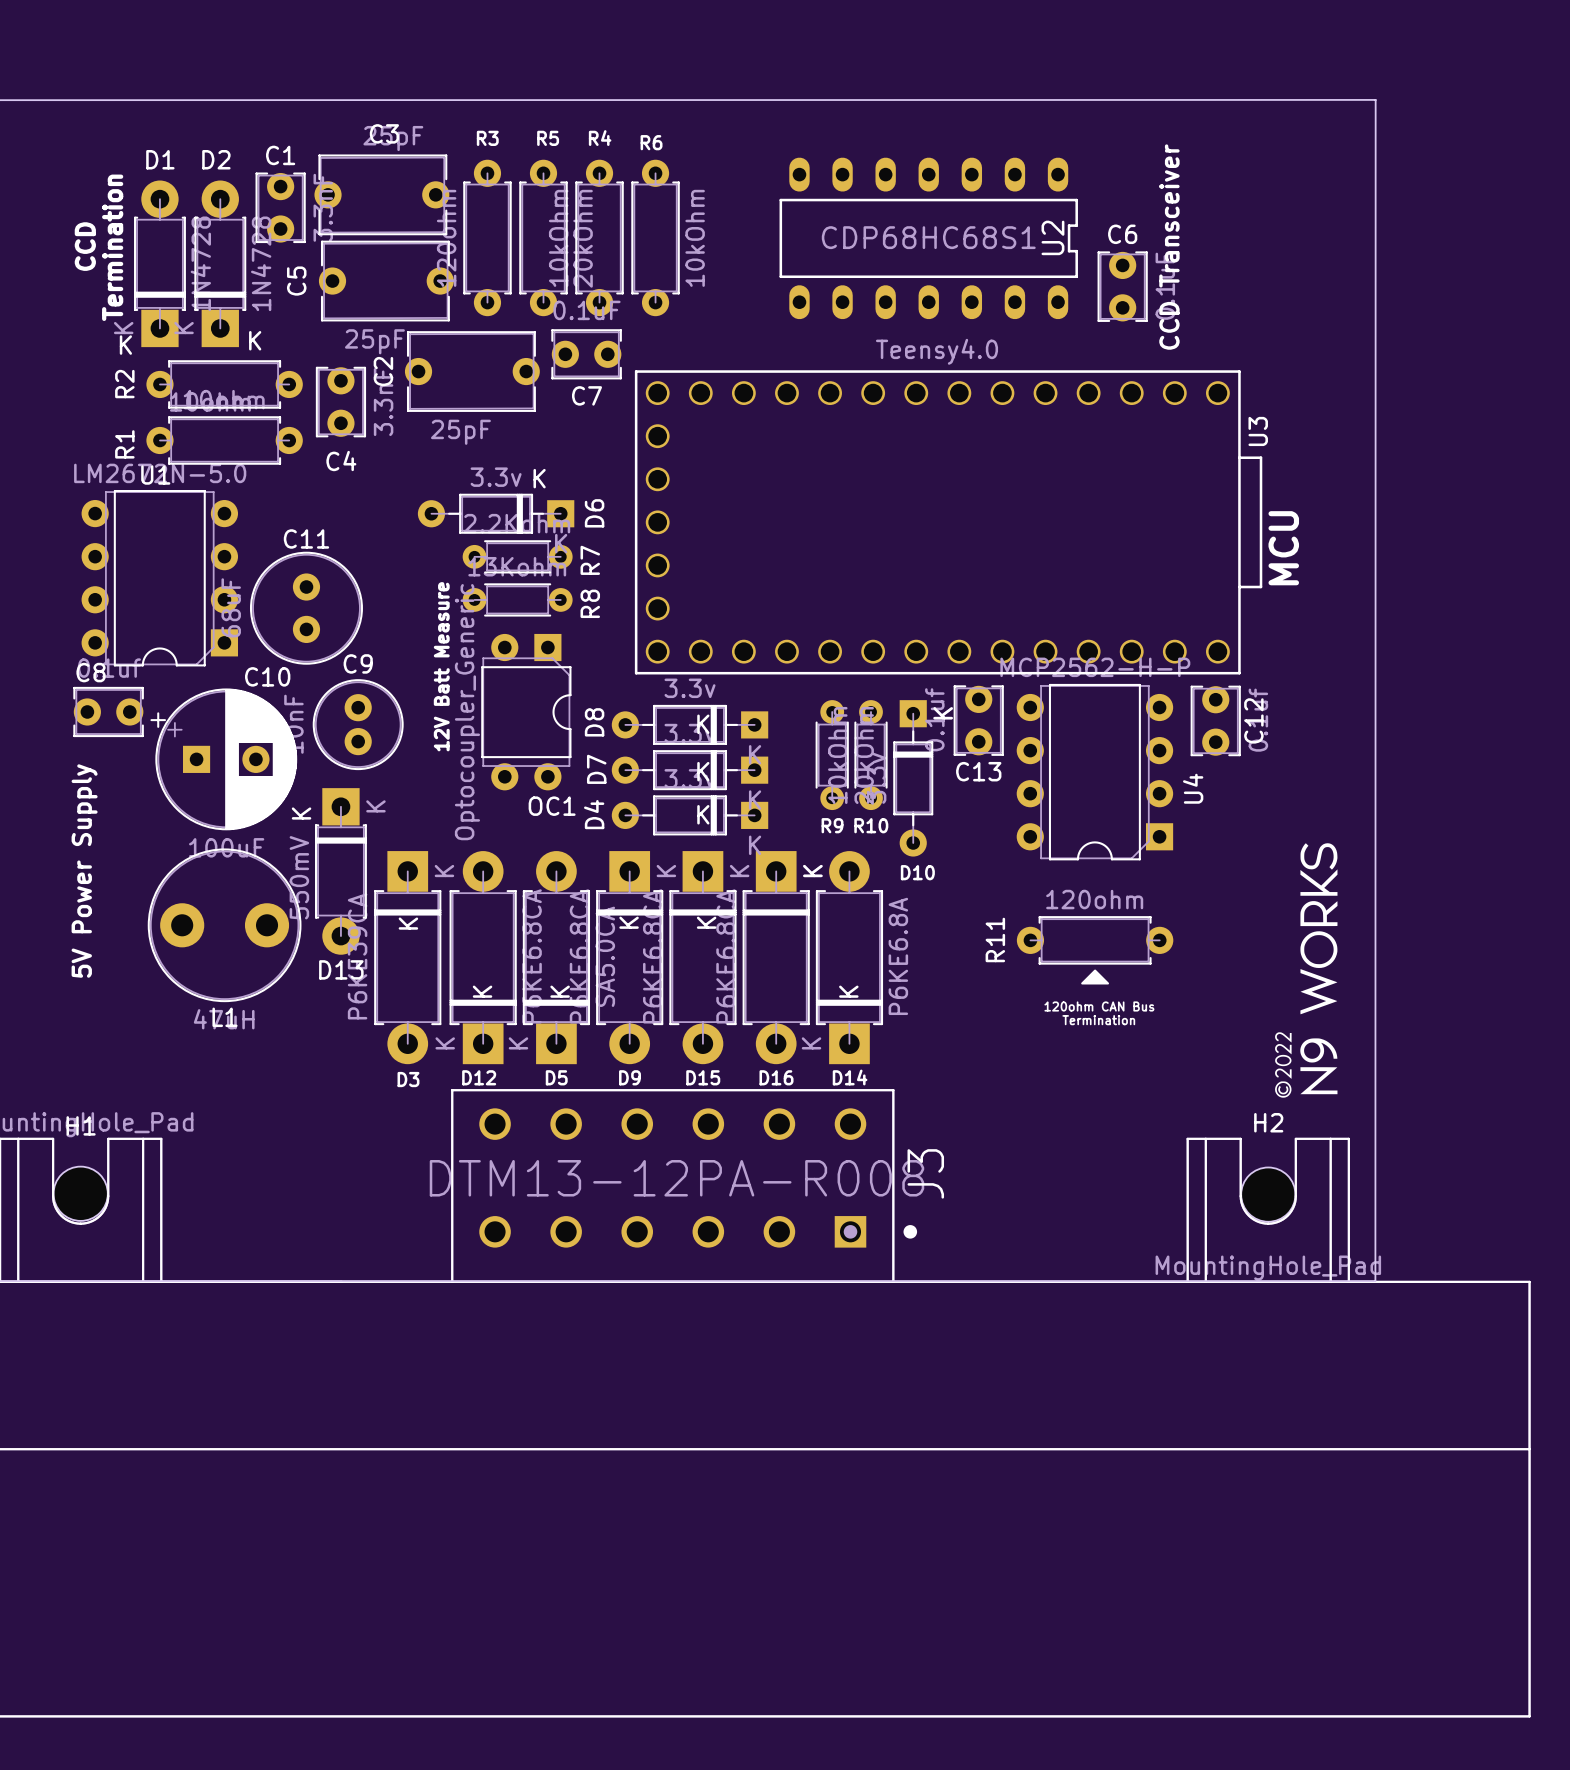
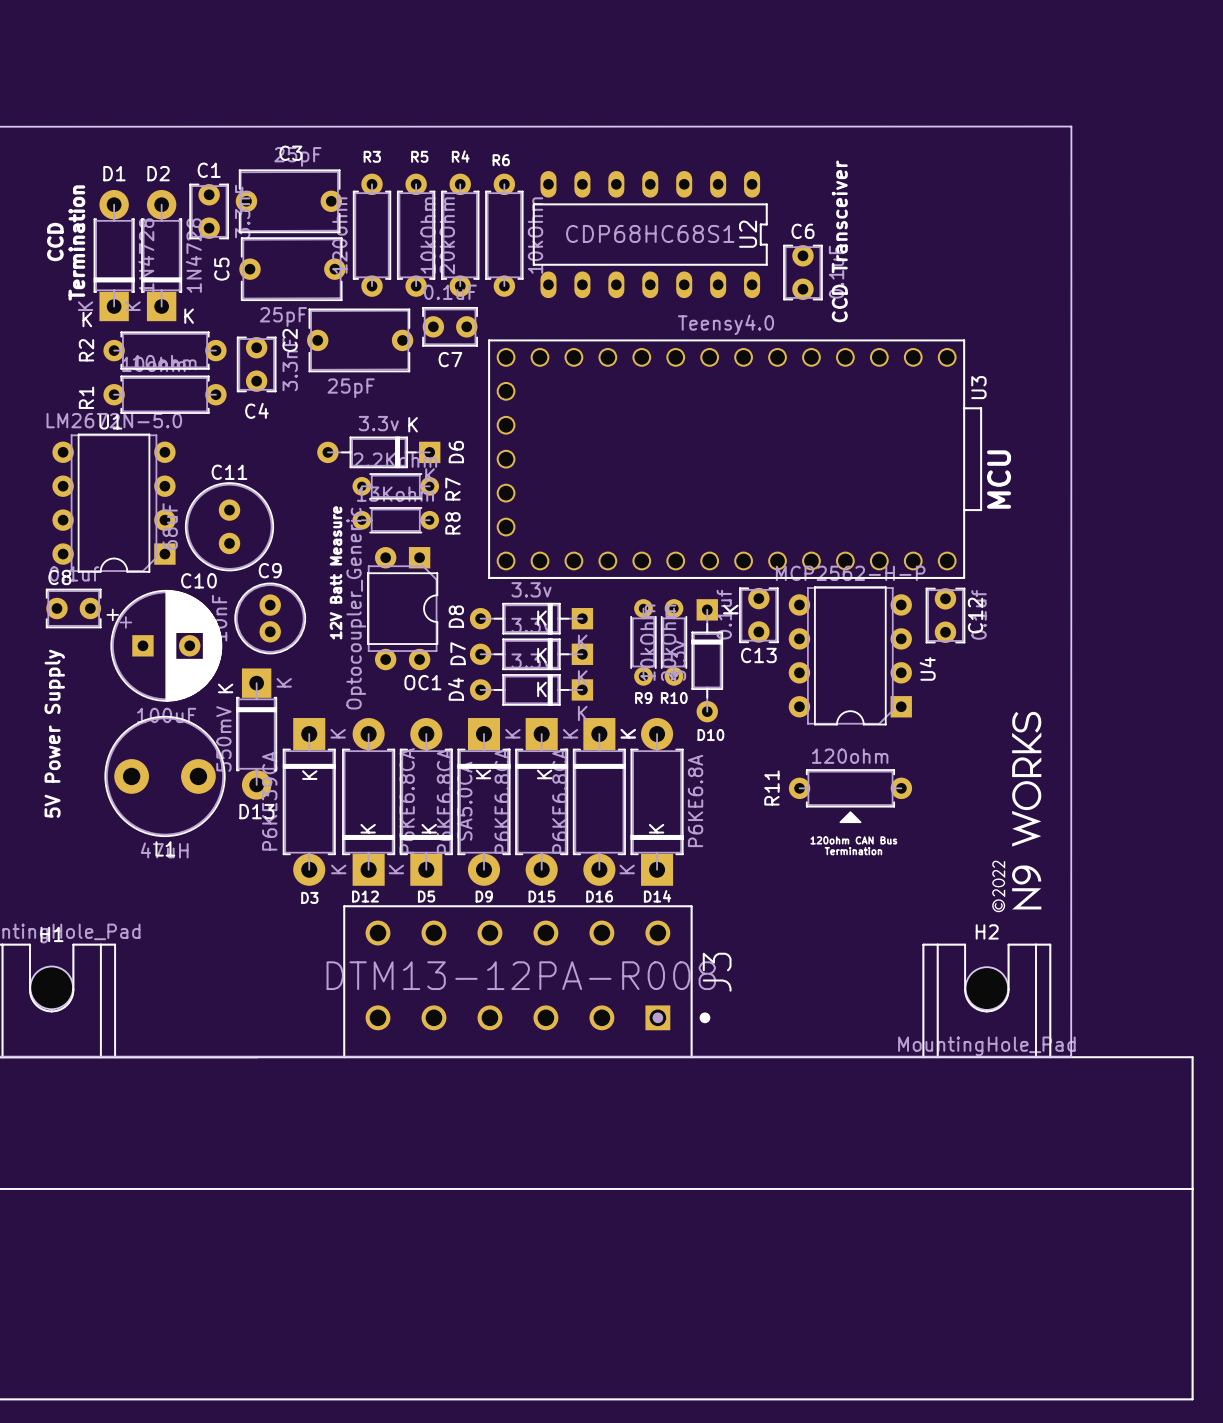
U2 position: (928, 238) -> (650, 234)
text position: CCD Transceiver (1169, 247) -> CCD Transceiver (839, 241)
C6 position: (1122, 286) -> (802, 272)

